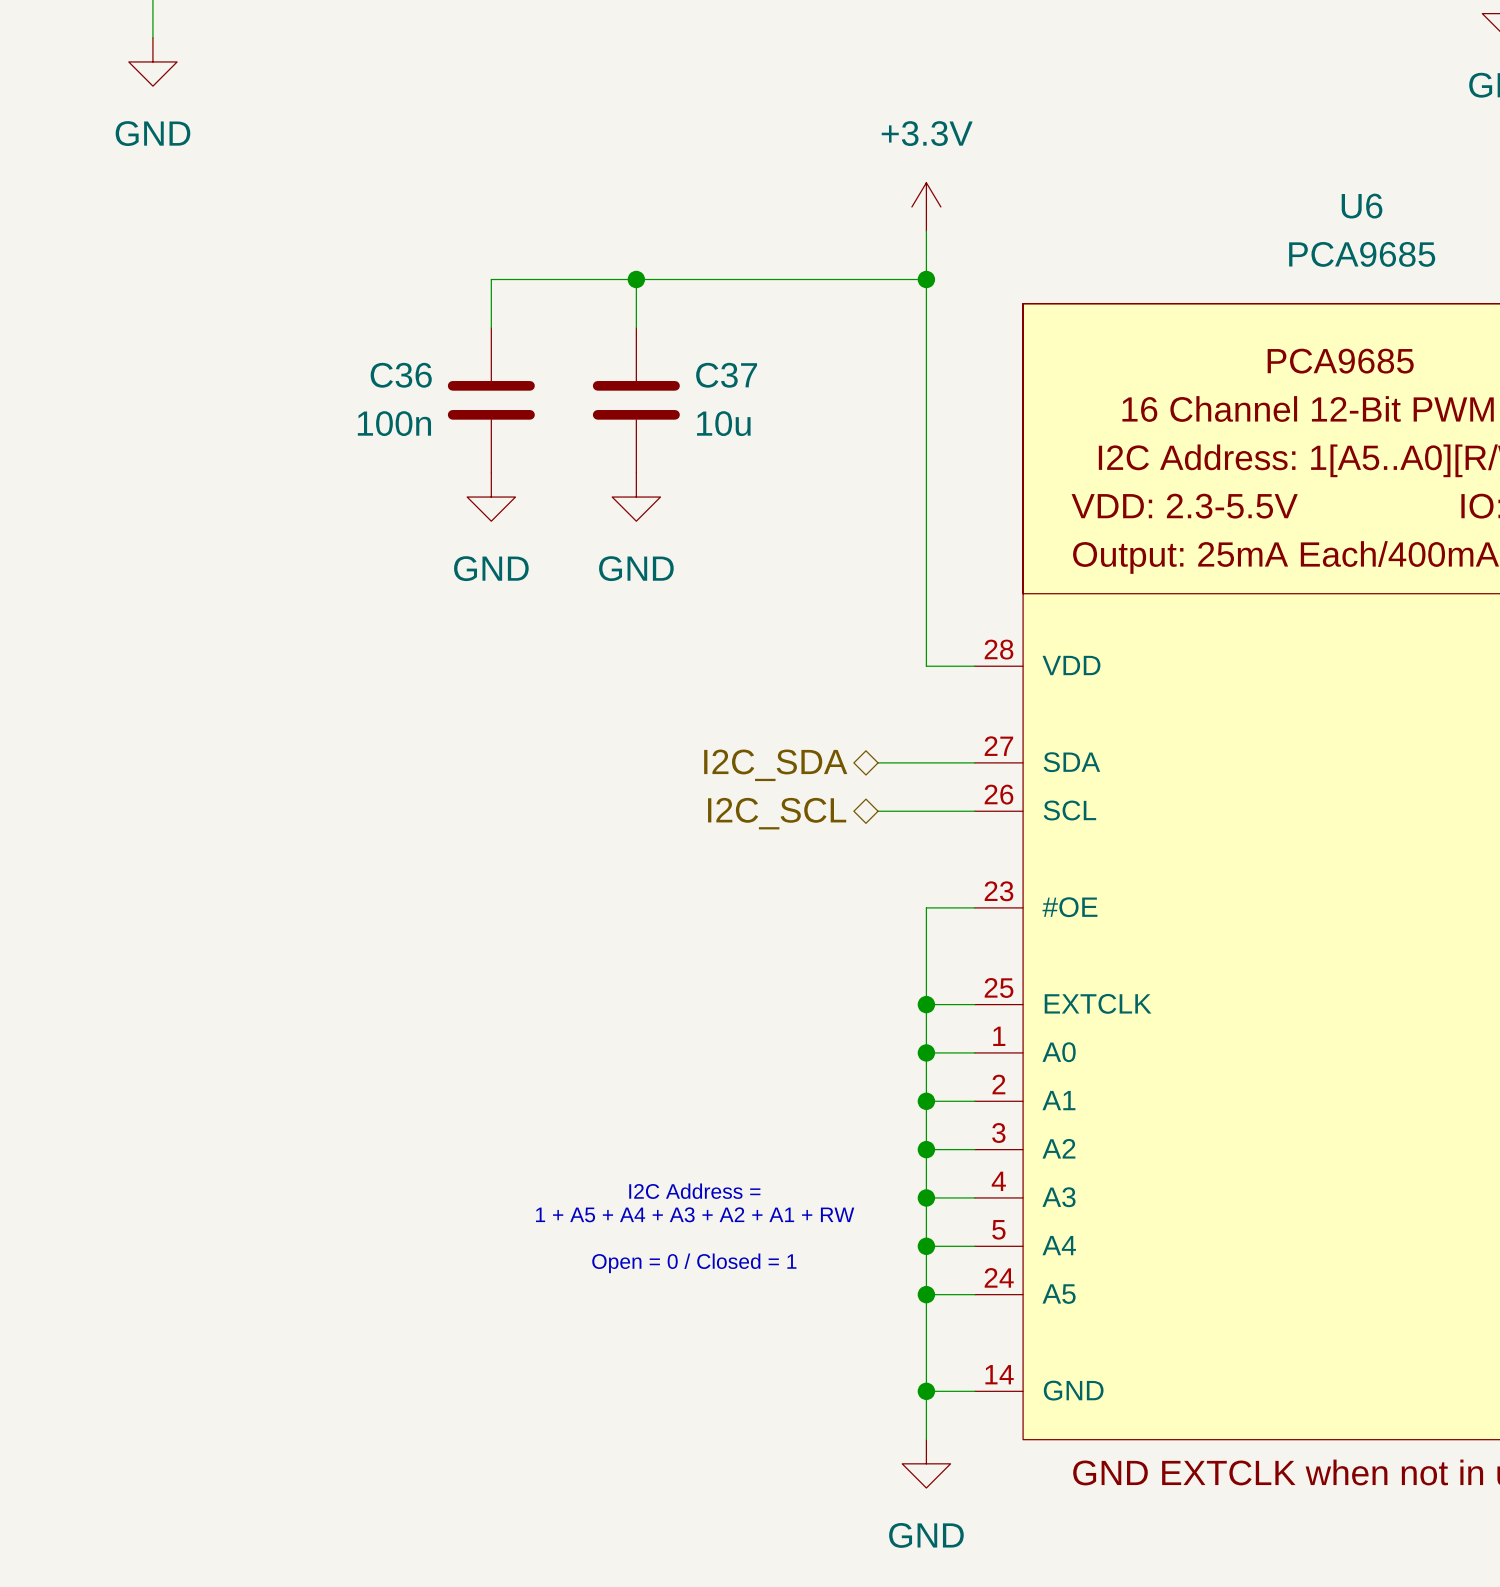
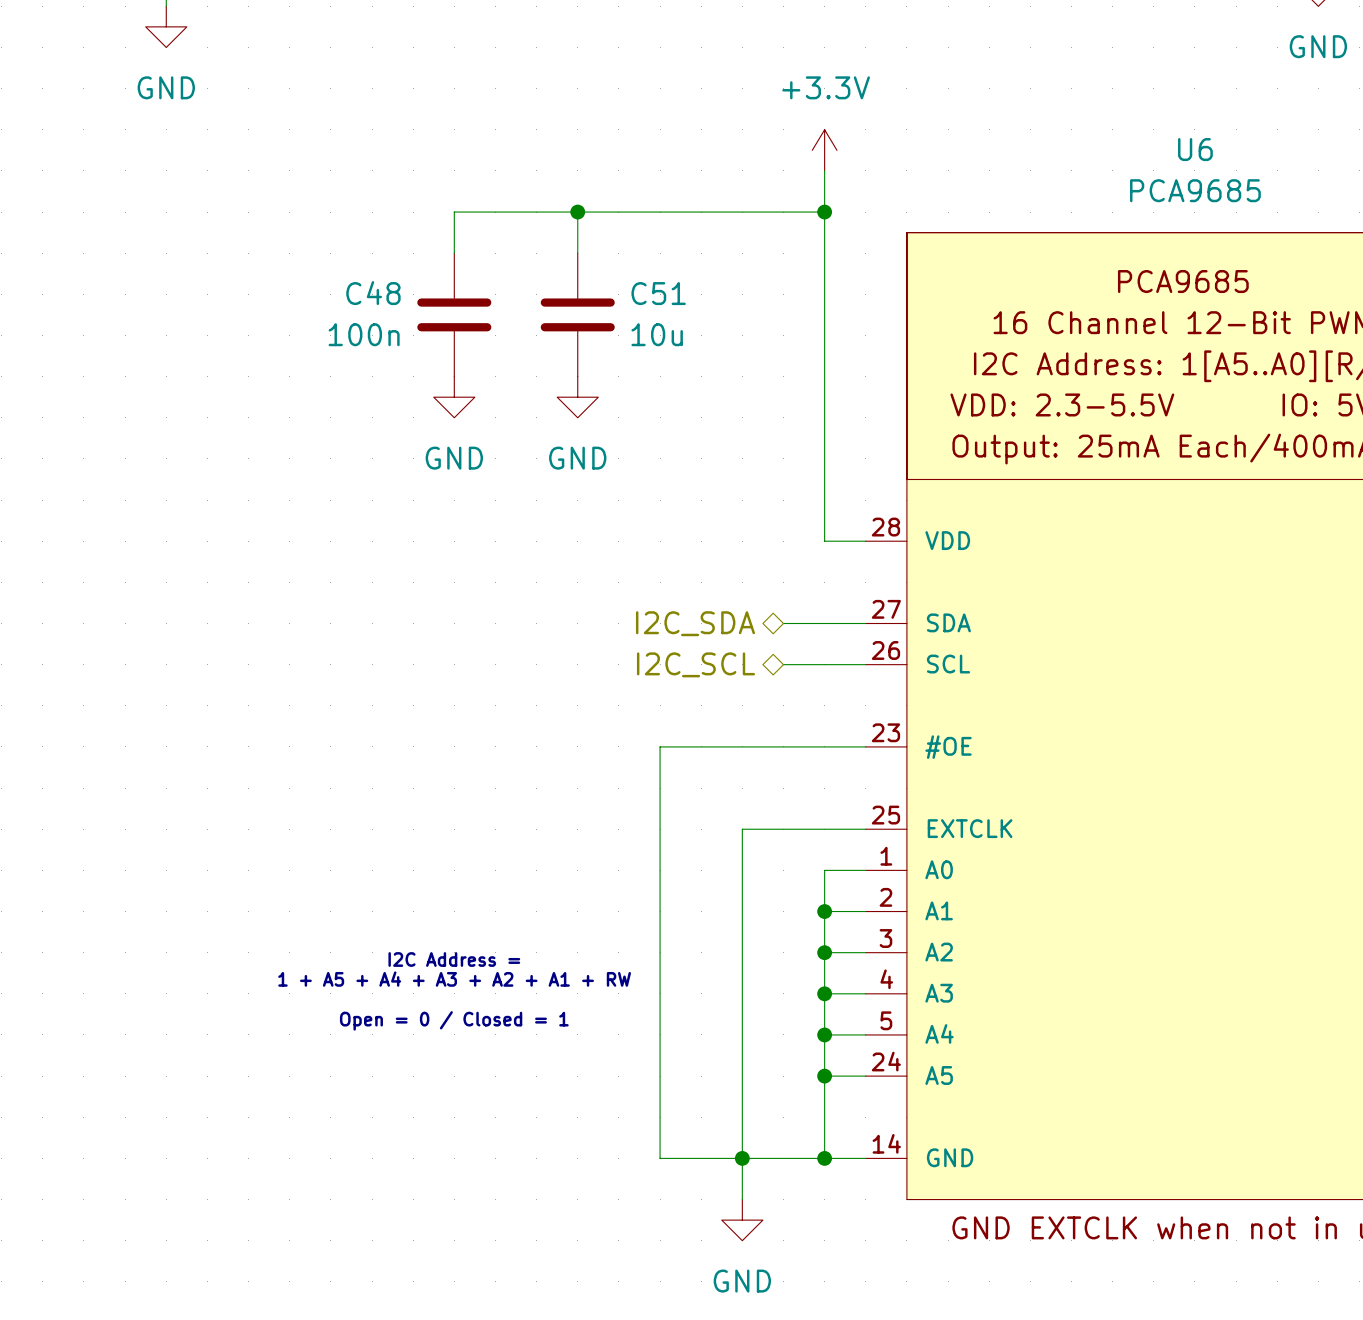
C36 name: C36 (401, 375) -> C48 (373, 293)
C37 name: C37 (726, 375) -> C51 (658, 293)
wire: (926, 907) (926, 1052) -> (824, 746) (660, 746) (660, 1158) (824, 1158)
wire: none -> (824, 829) (742, 829) (742, 1199)
junction: (926, 1004) -> none
junction: (926, 1052) -> none
text position: I2C Address = (694, 1191) -> I2C Address = (454, 959)
text position: 1 + A5 + A4 + A3 + A2 + A1 + RW (695, 1214) -> 1 + A5 + A4 + A3 + A2 + A1 + RW (454, 979)
text position: Open = 0 / Closed = 1 (694, 1263) -> Open = 0 / Closed = 1 (454, 1020)
junction: none -> (742, 1158)
wire: (926, 1391) (926, 1439) -> none
power symbol position: GND (926, 1463) -> GND (742, 1220)

